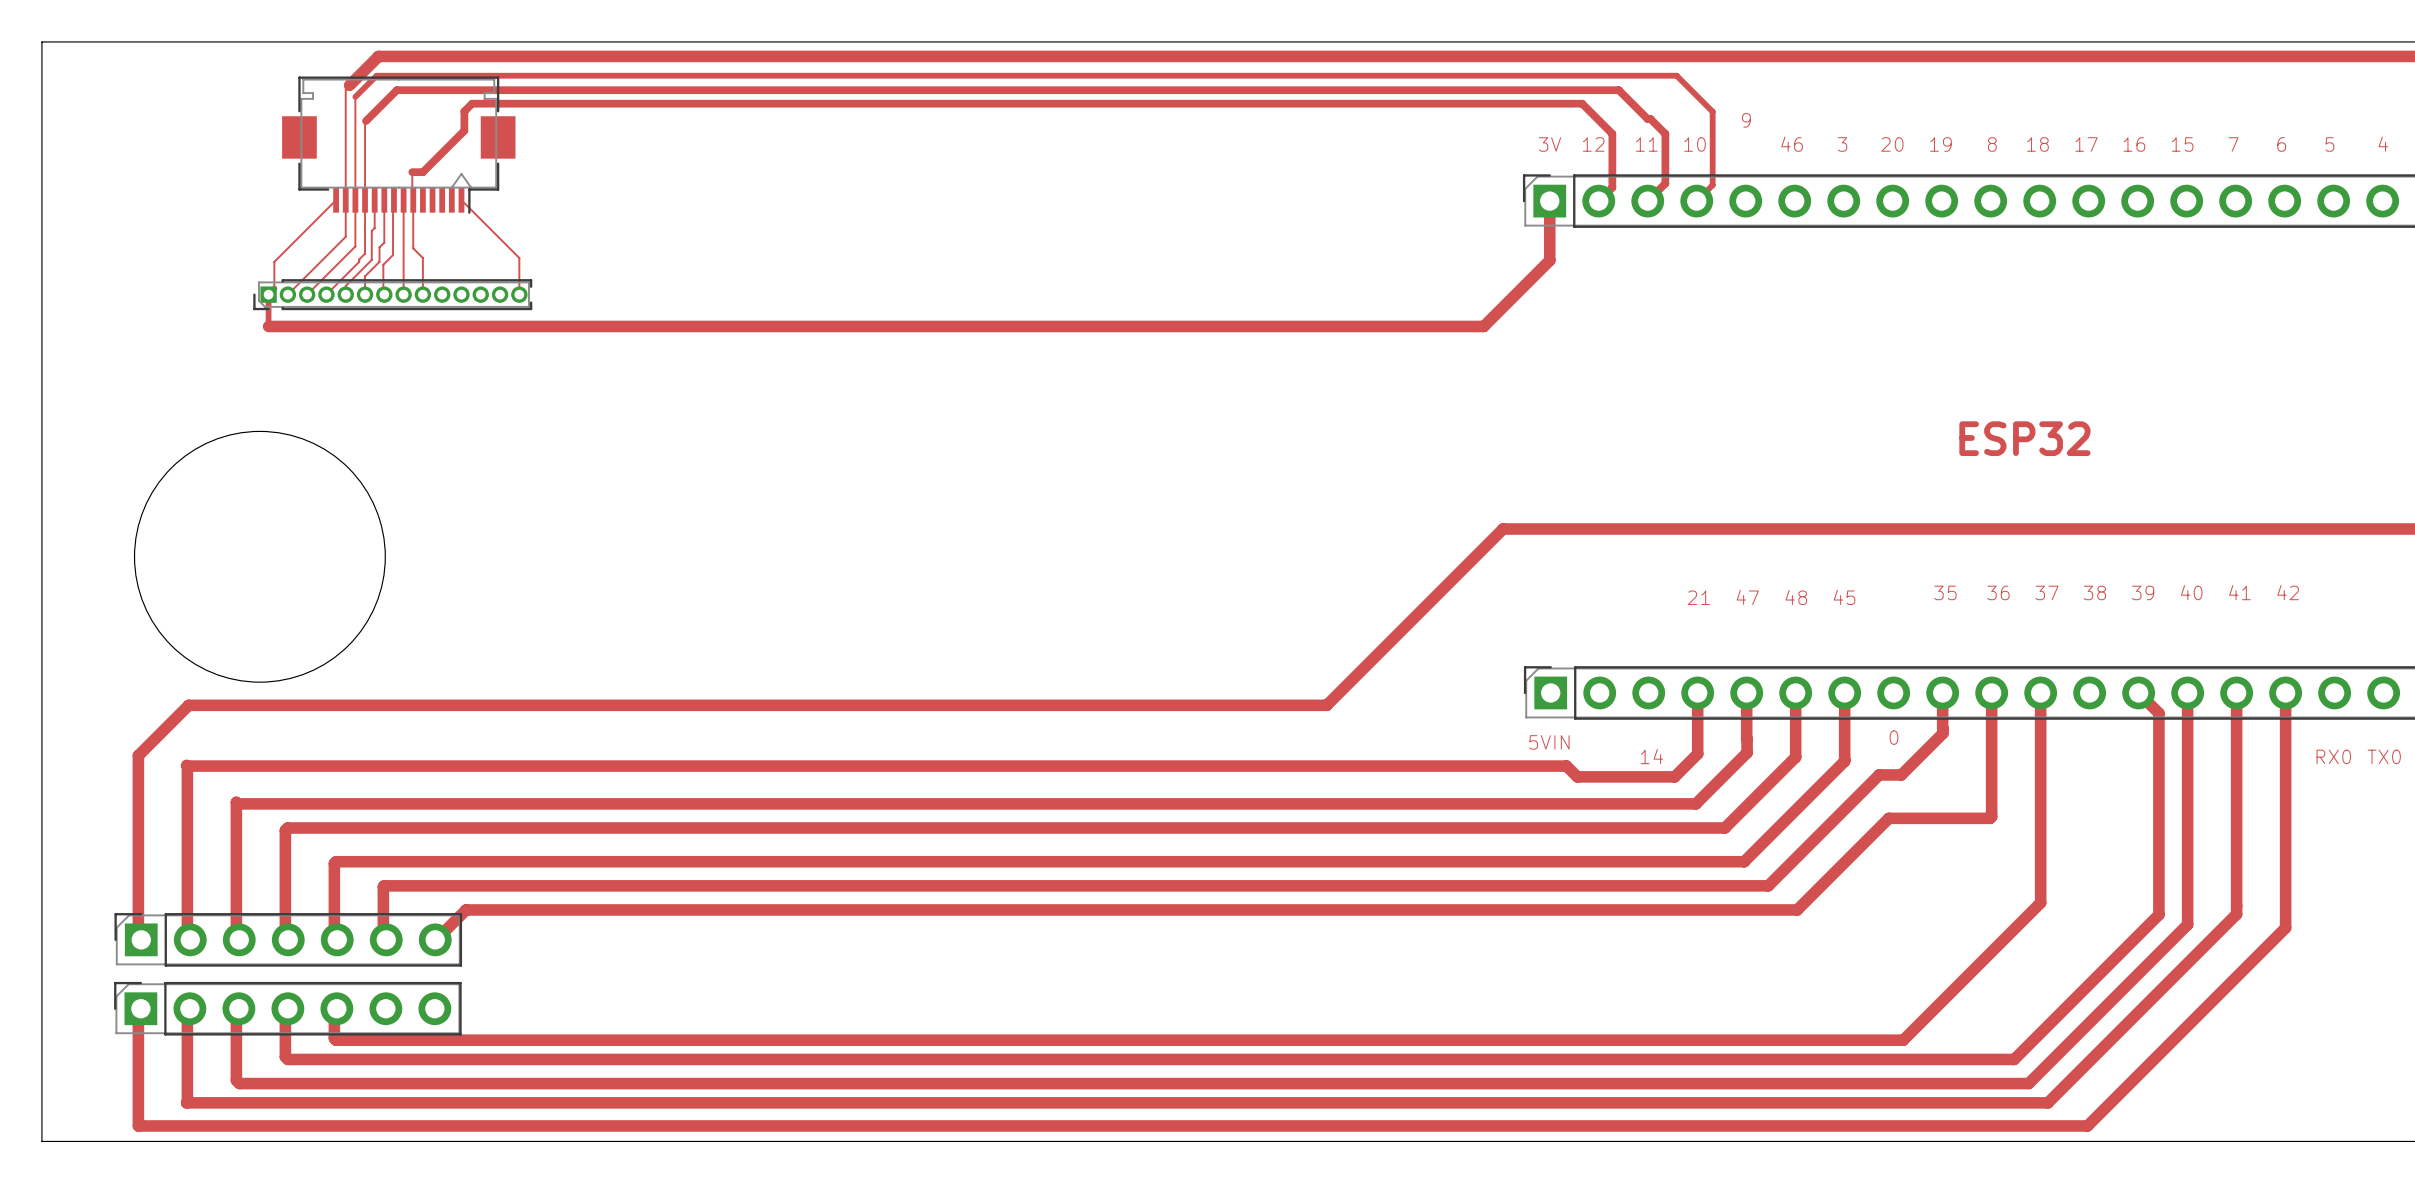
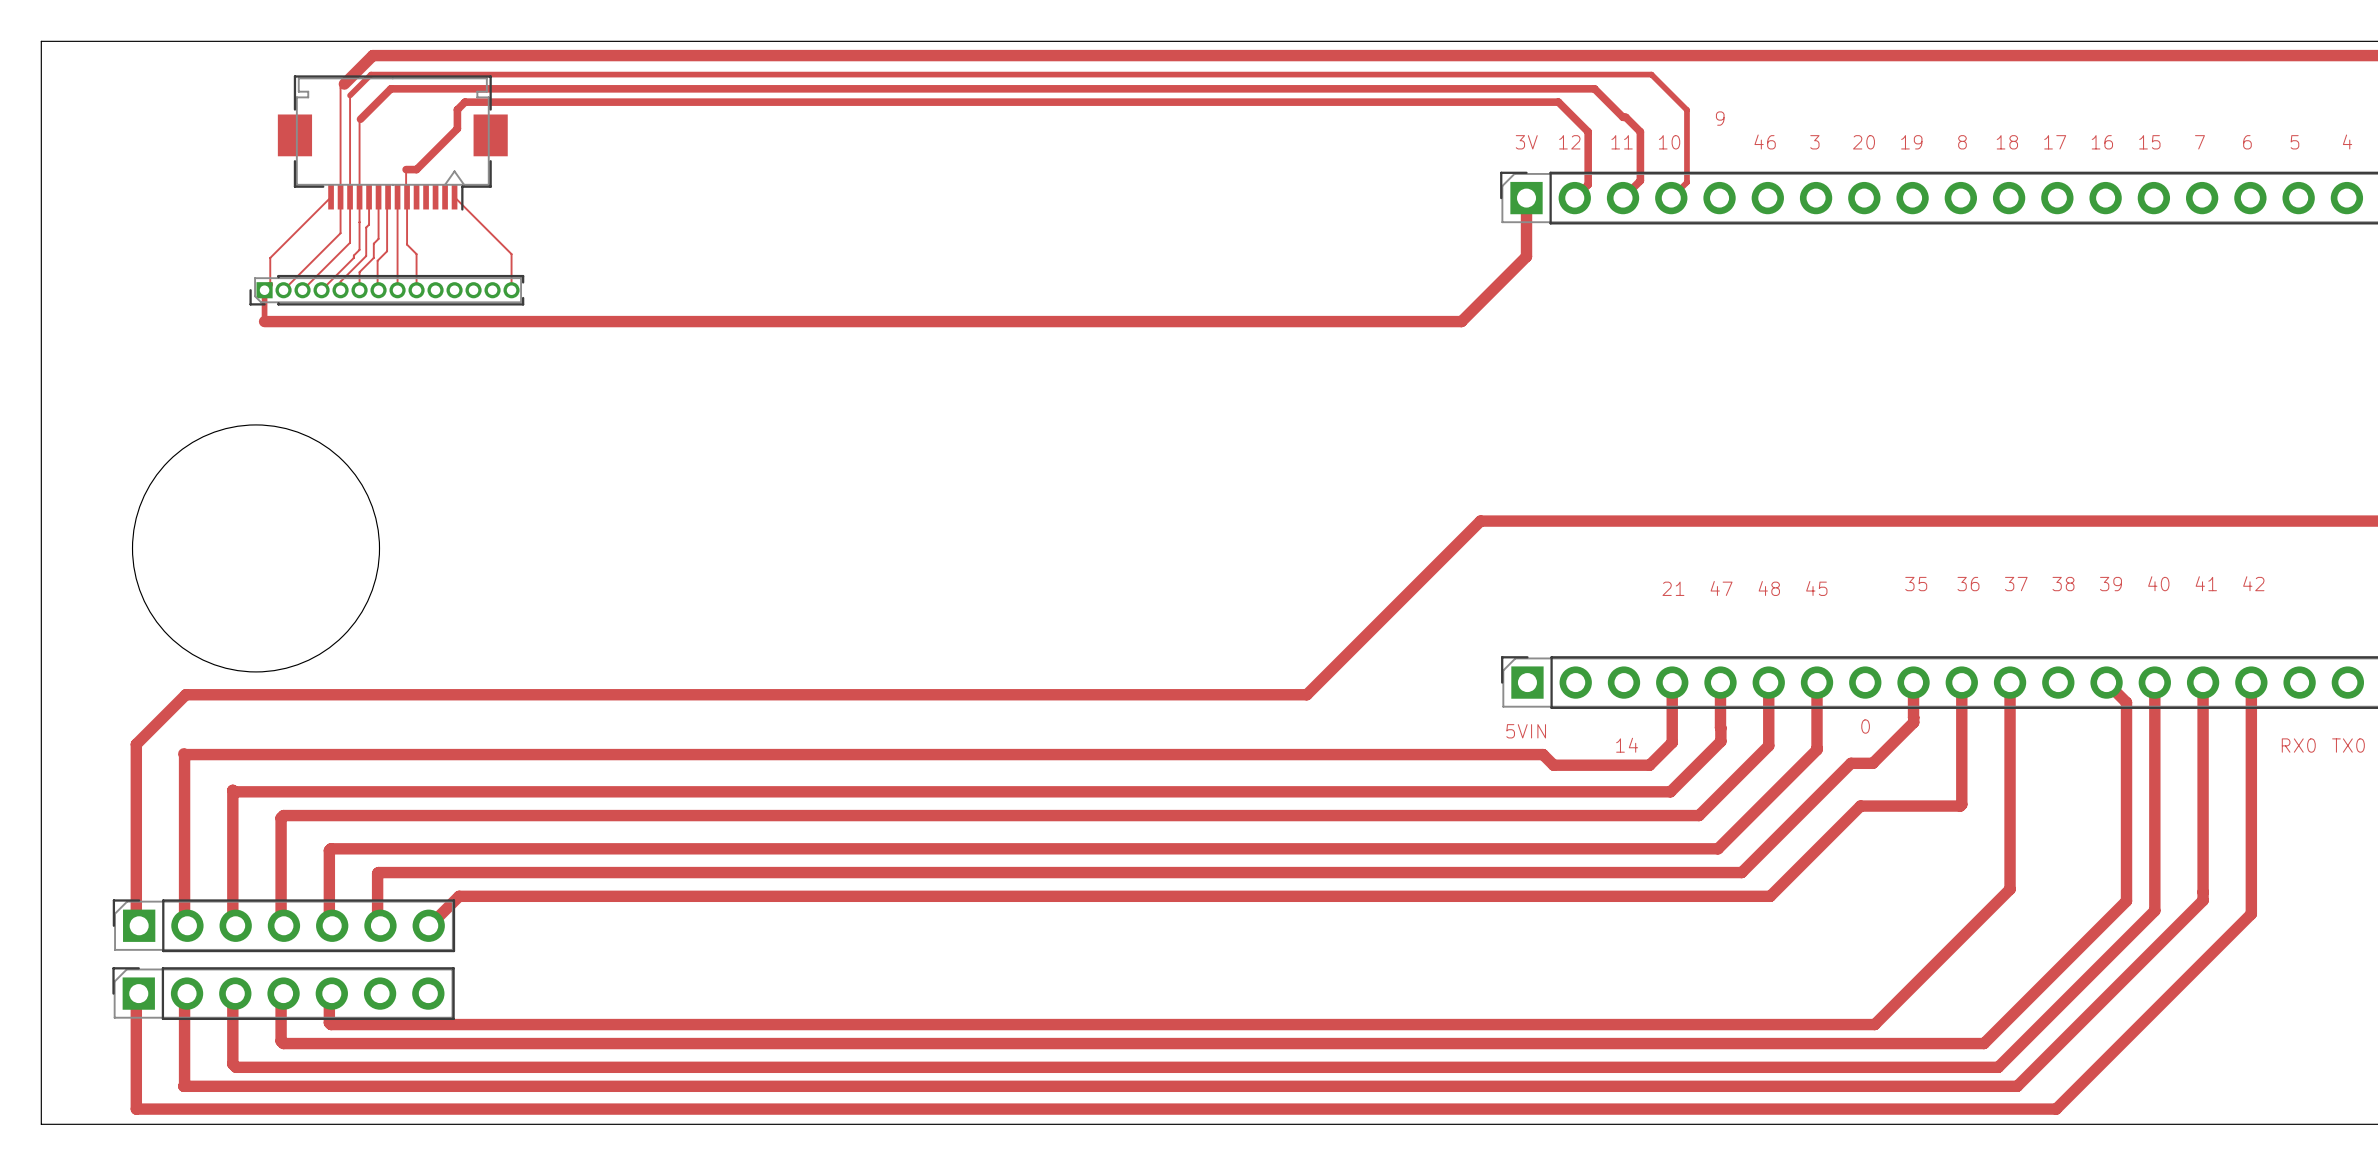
text: ESP32 (2024, 438) -> none

